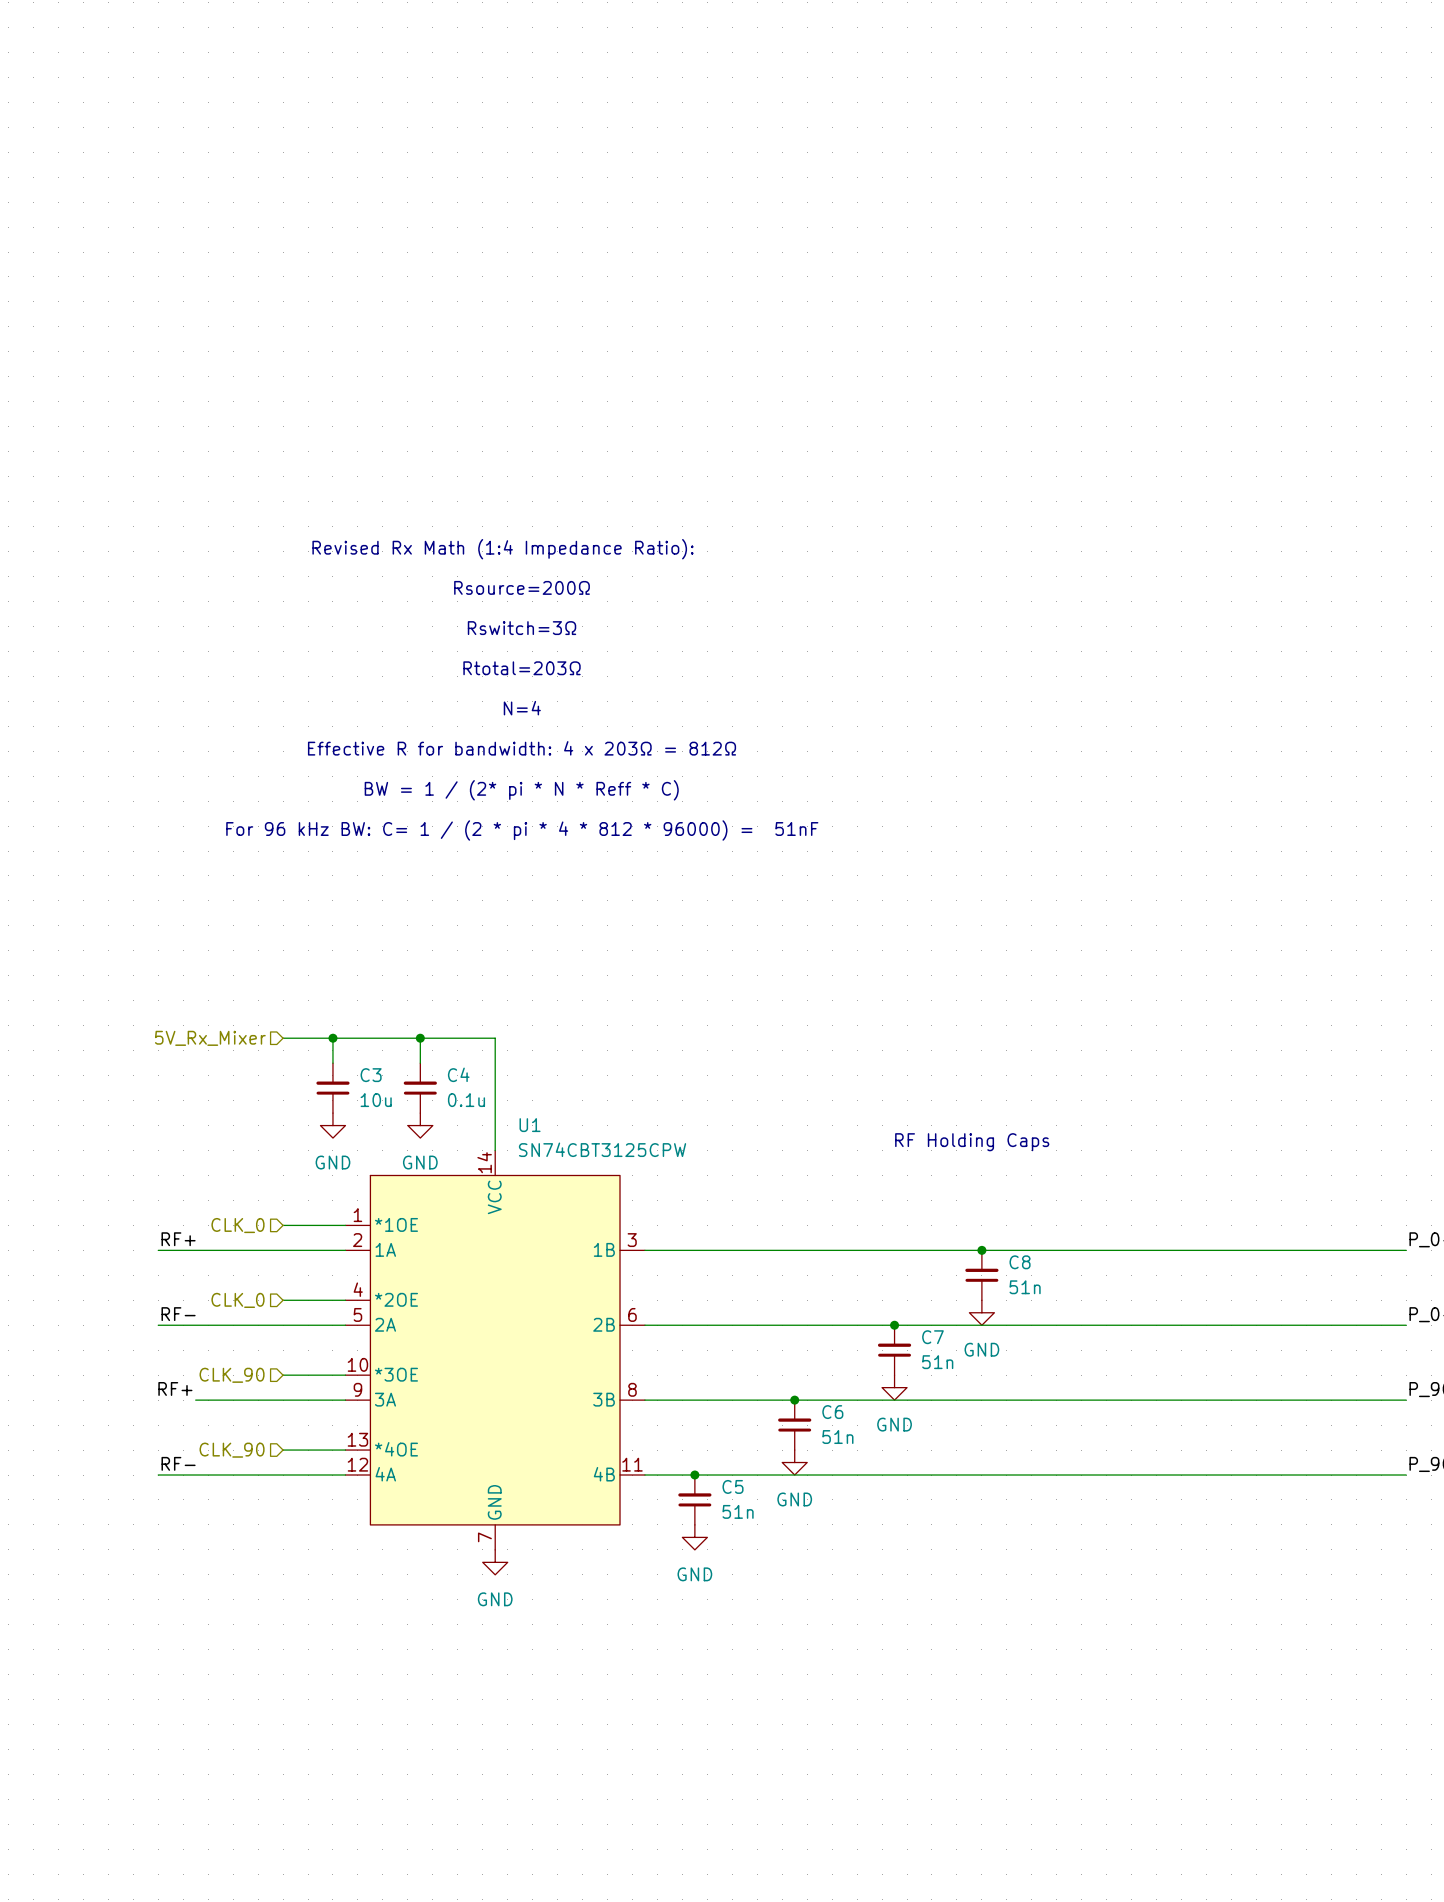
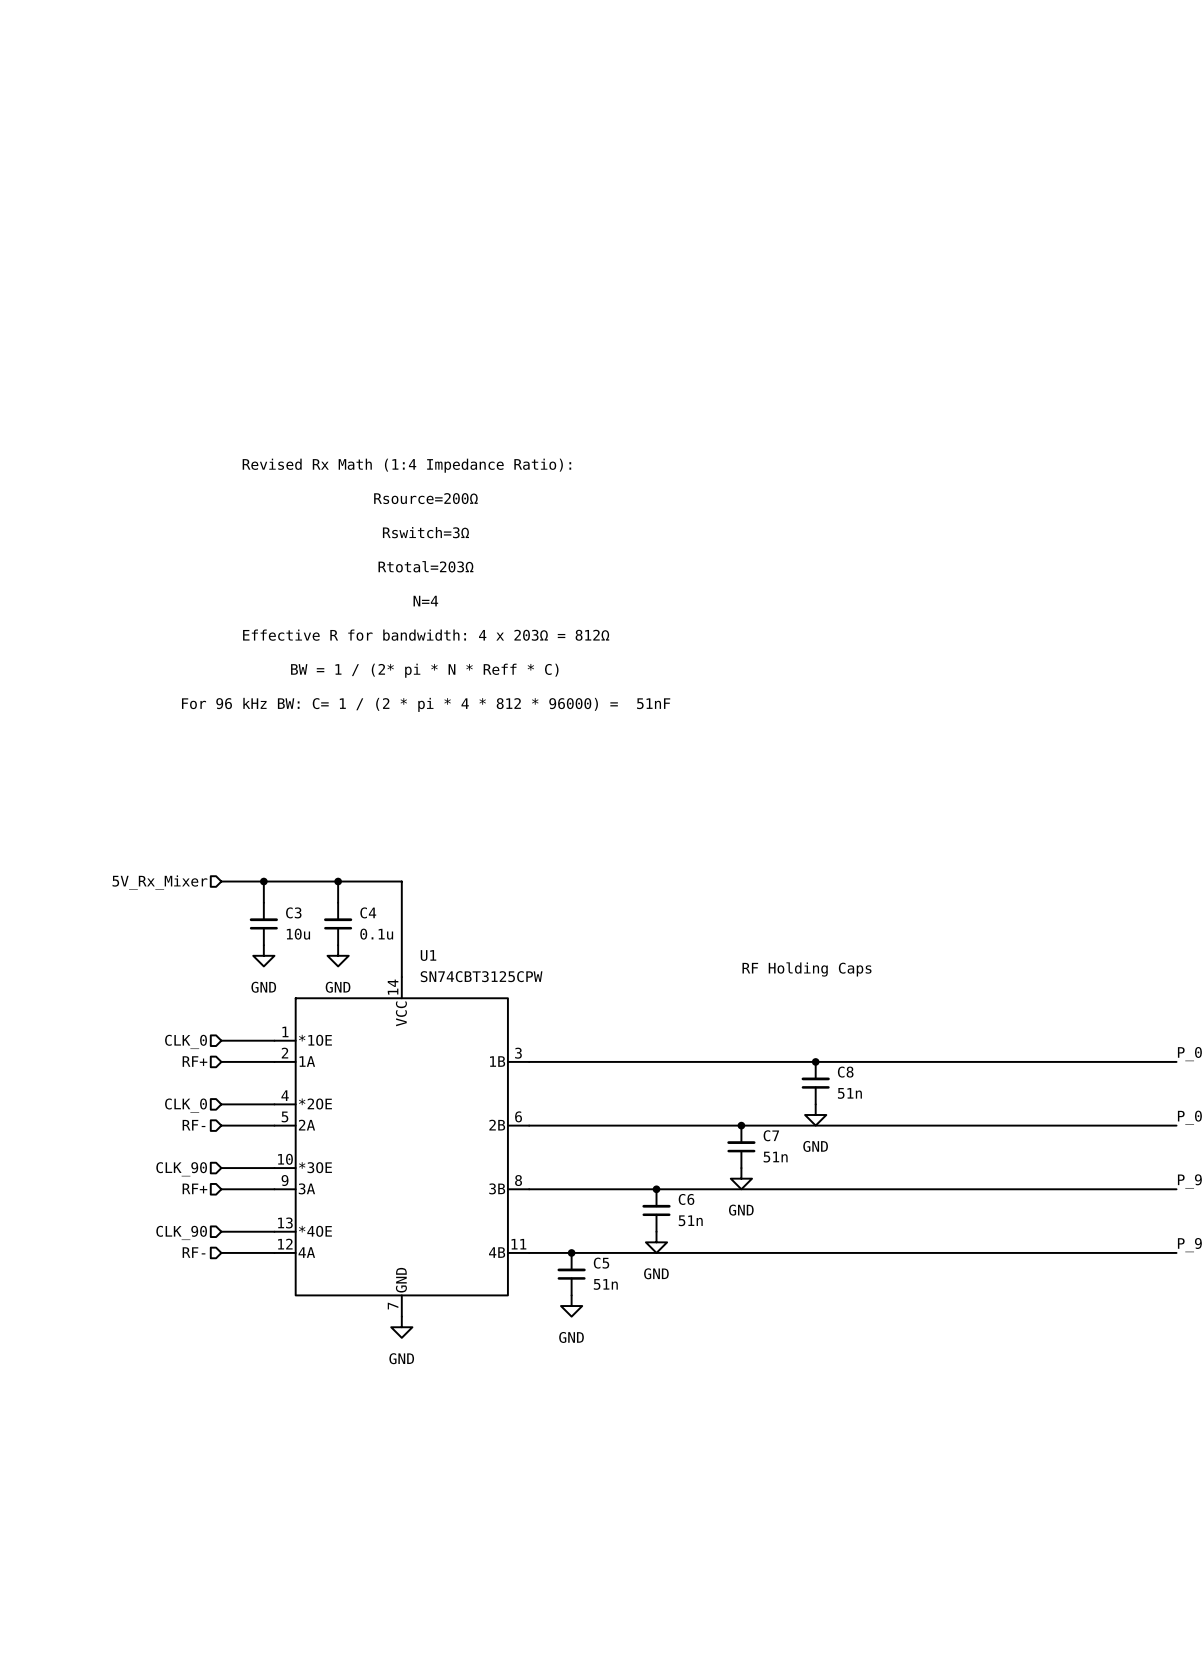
label: RF+ (178, 1239) -> none
hierarchical label: none -> RF+ (194, 1061)
wire: (158, 1250) (283, 1250) -> none
label: RF- (178, 1314) -> none
hierarchical label: none -> RF- (194, 1125)
wire: (158, 1325) (283, 1325) -> none
label: RF+ (175, 1388) -> none
hierarchical label: none -> RF+ (194, 1188)
wire: (195, 1400) (283, 1400) -> none
label: RF- (178, 1463) -> none
hierarchical label: none -> RF- (194, 1252)
wire: (158, 1475) (283, 1475) -> none

